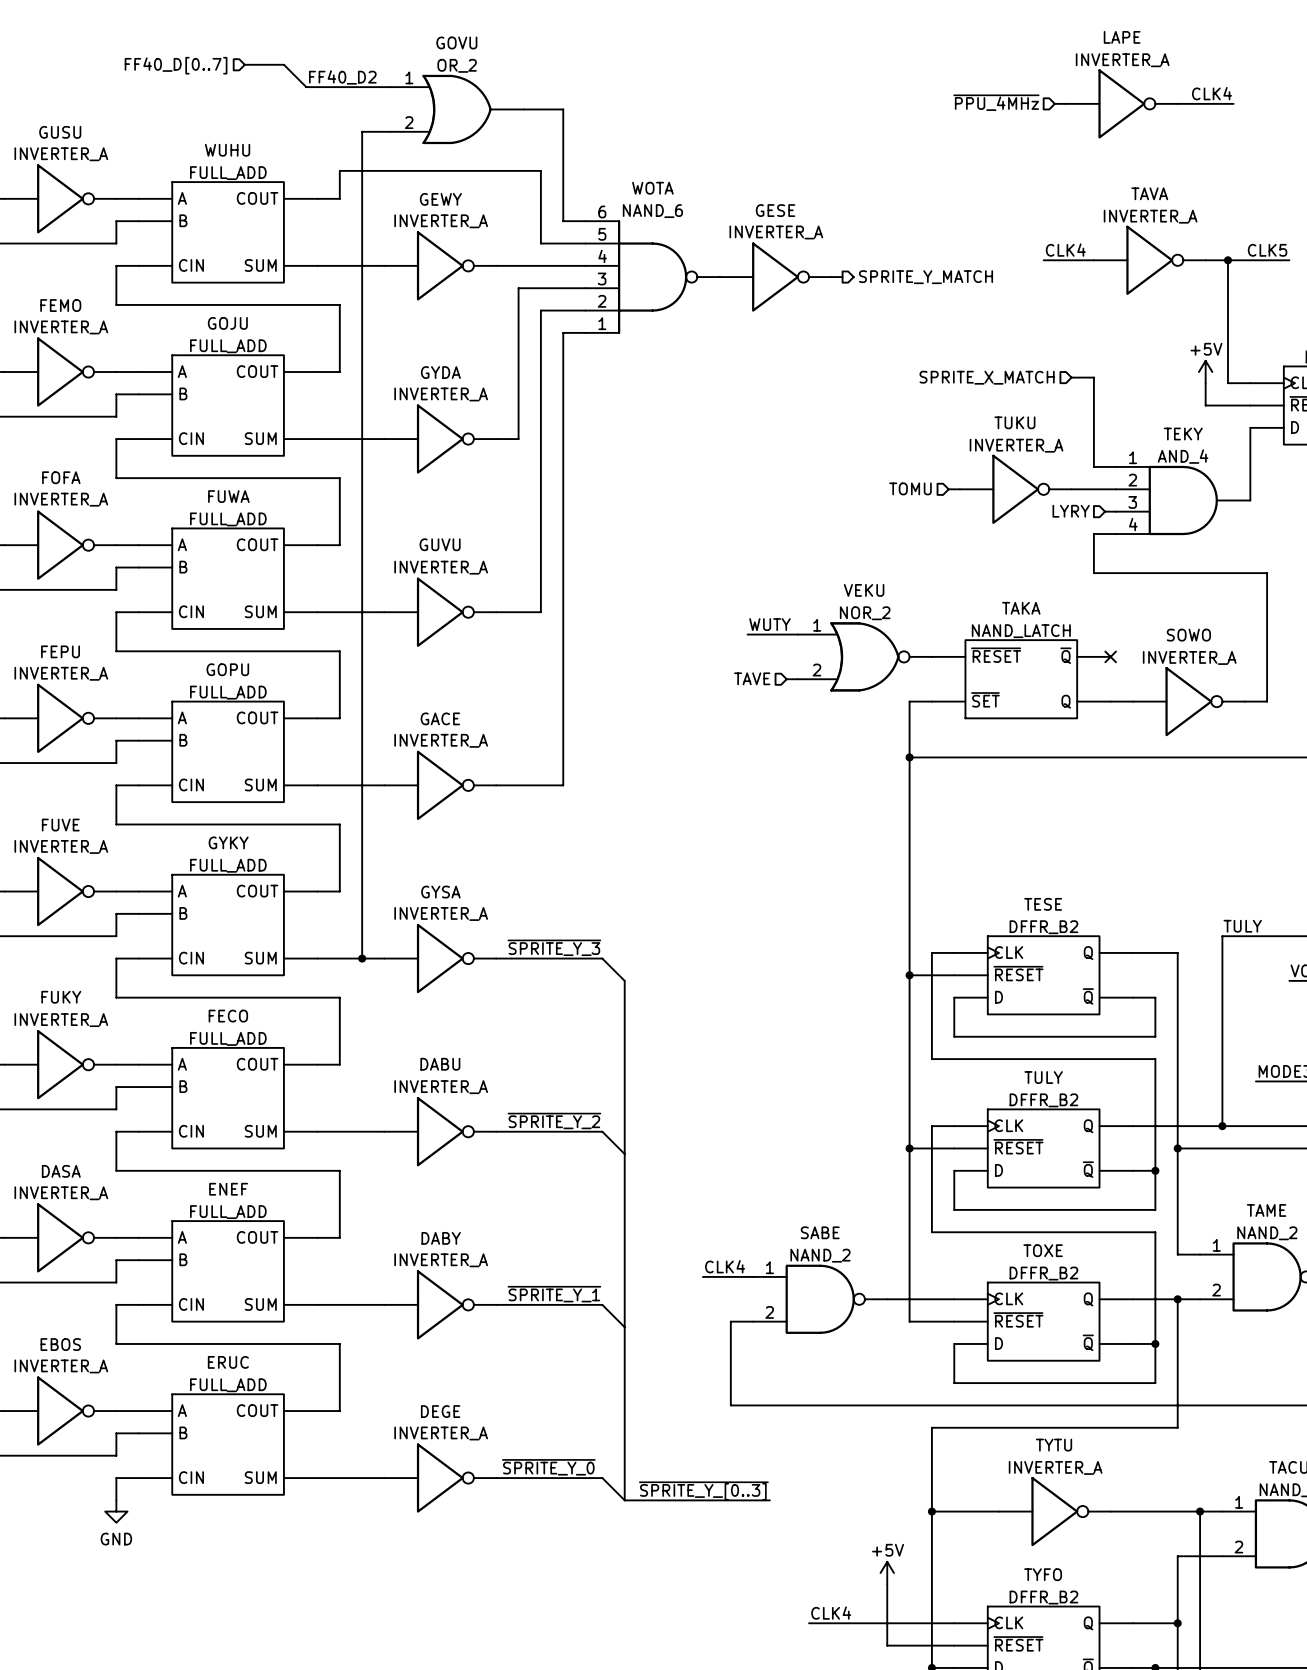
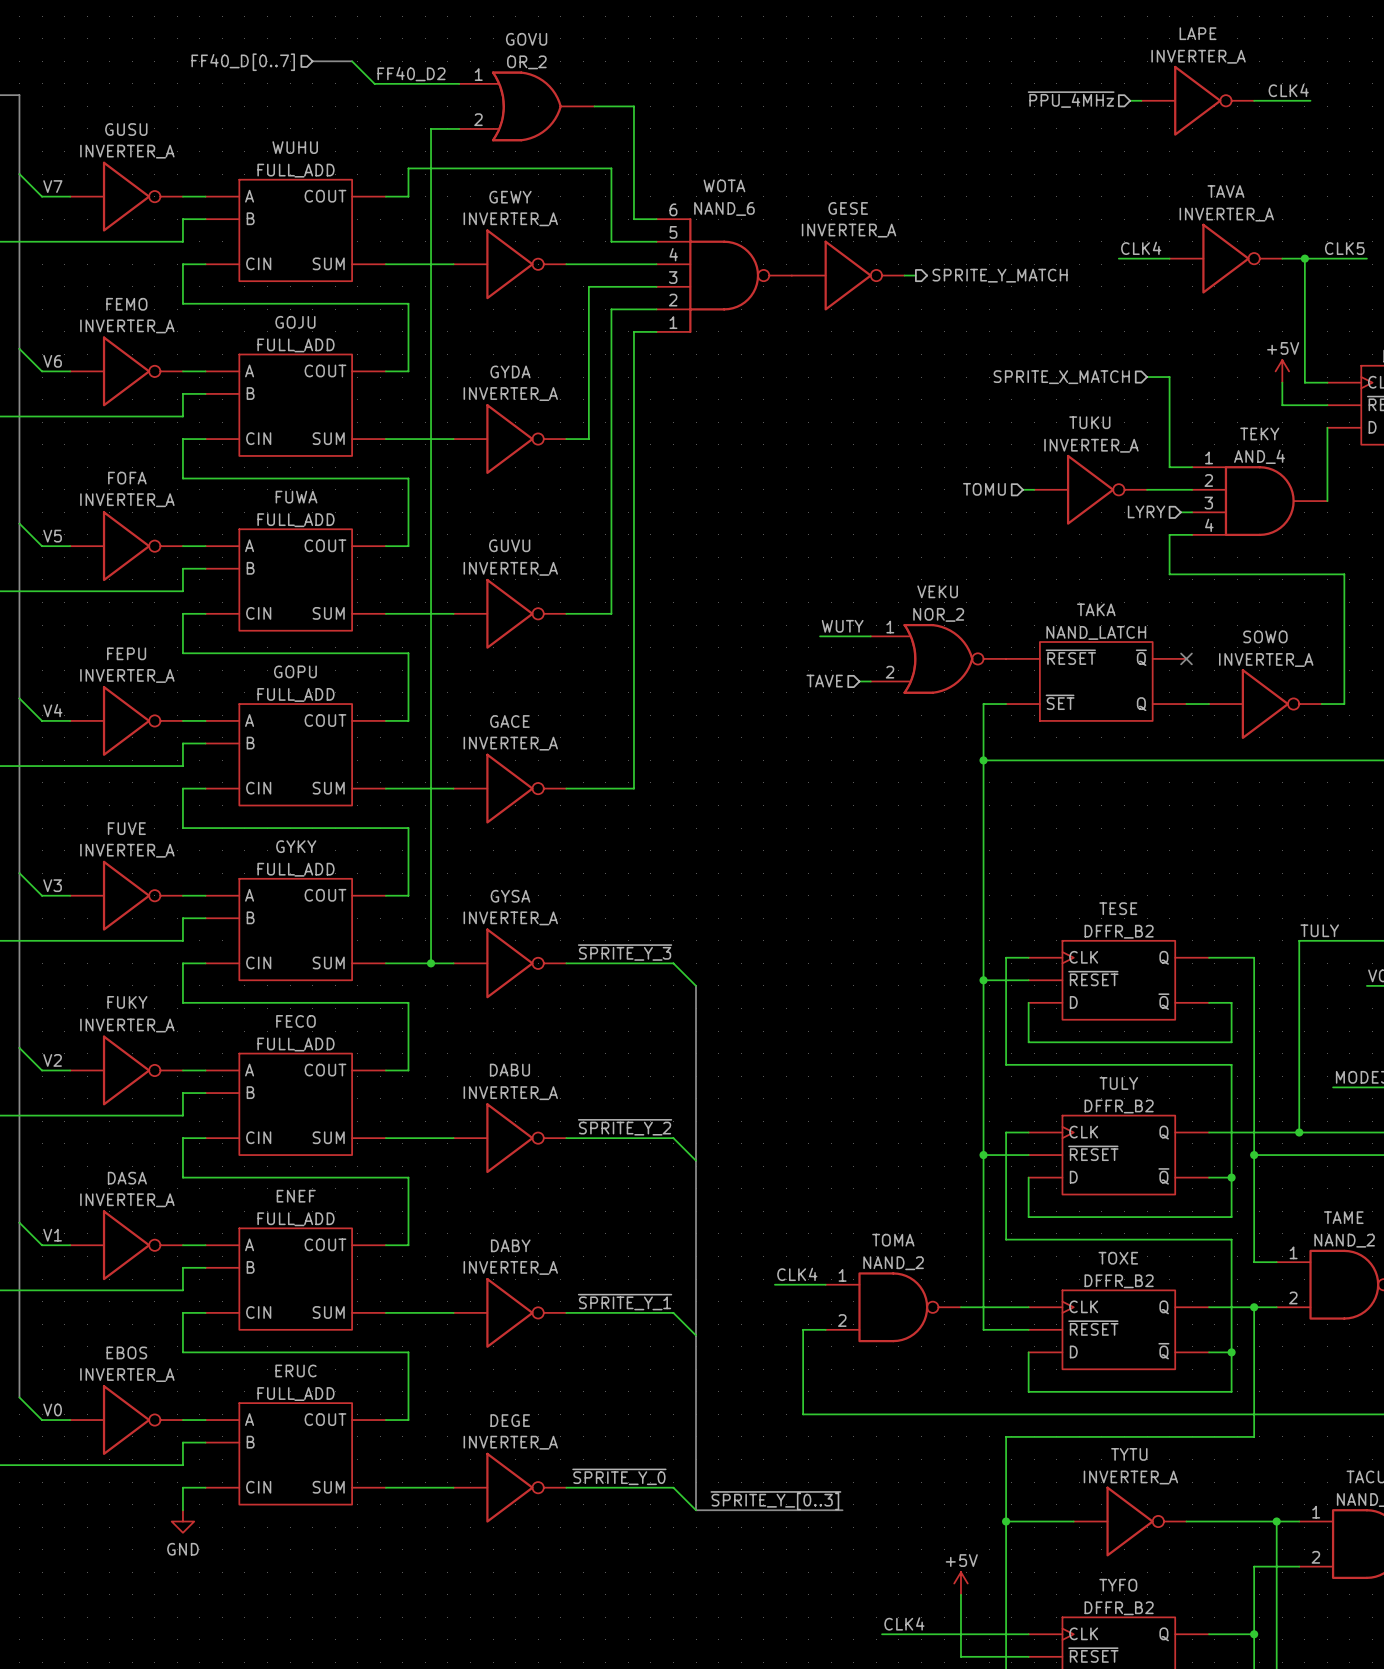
SABE name: SABE (820, 1232) -> TOMA (893, 1240)

